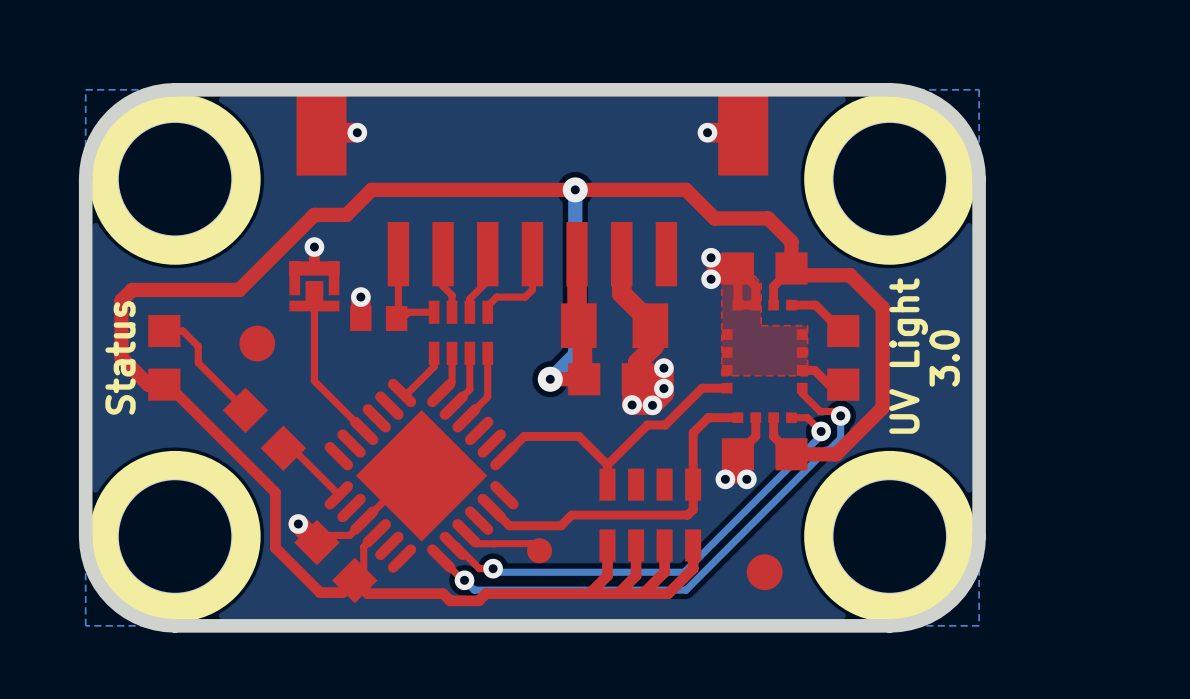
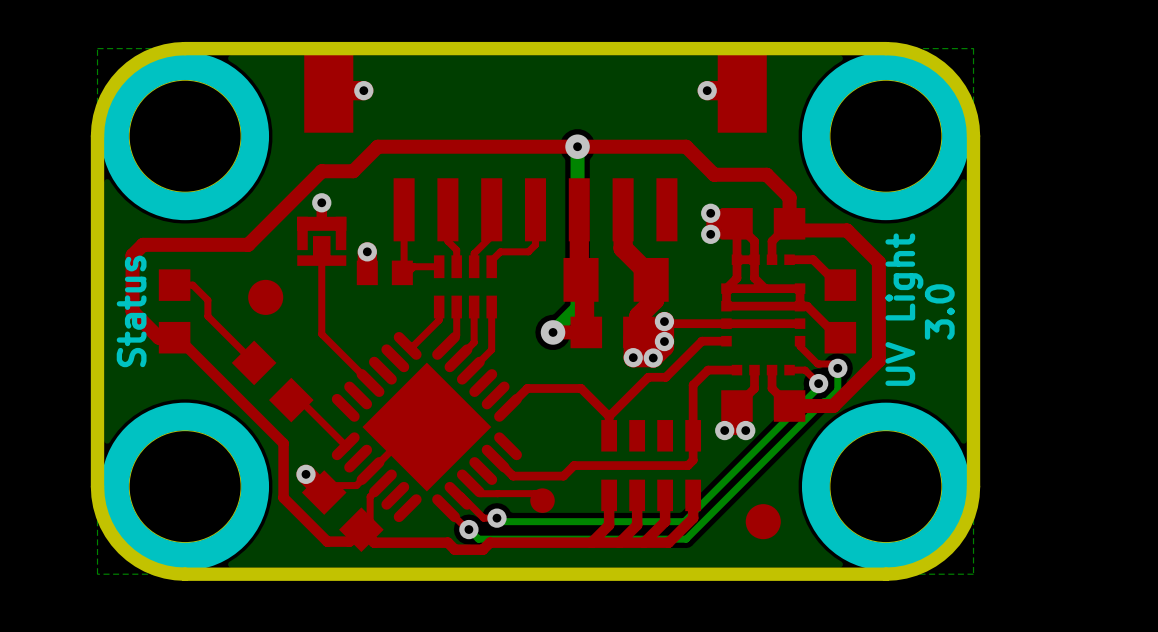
top zone outline: (721, 275) (721, 375) (807, 375) (807, 325) (761, 325) (761, 282) (753, 275) (721, 275) -> none
top track: none -> (736, 259) (736, 278) (726, 288)
top track: none -> (754, 259) (754, 278) (765, 288)
top track: none -> (726, 288) (800, 288) (800, 306)
top track: none -> (664, 321) (666, 323) (800, 323)
top track: (802, 370) (814, 370) (829, 384) (841, 384) -> (726, 288) (726, 306) (807, 306) (838, 337)

